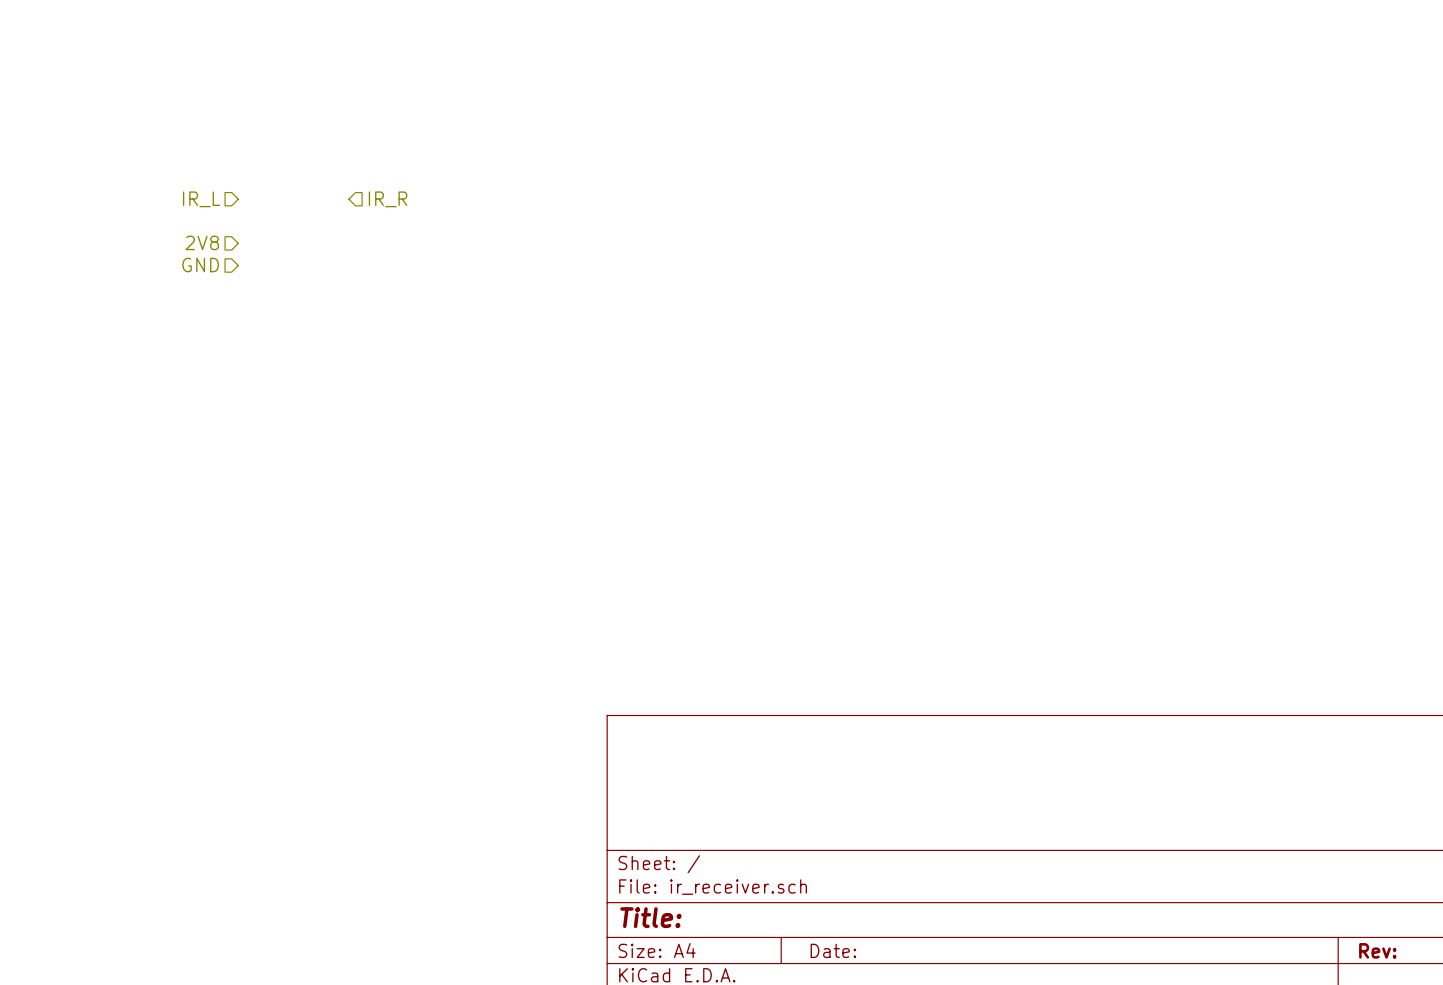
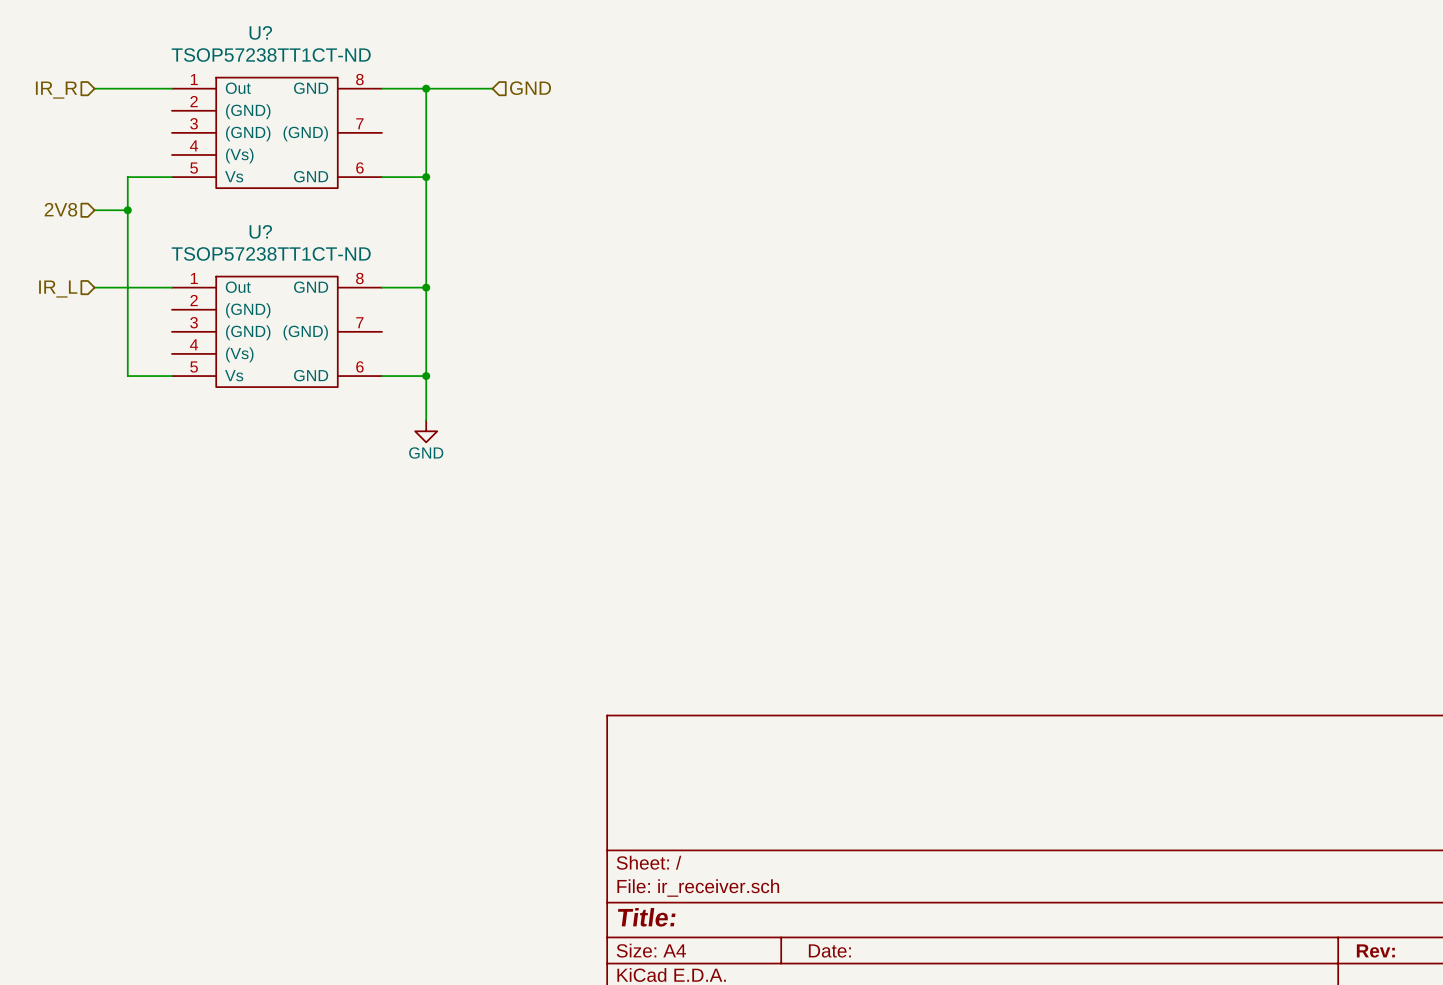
hierarchical label: none -> IR_R (56, 90)
wire: none -> (94, 88) (171, 88)
wire: none -> (381, 88) (492, 88)
wire: none -> (426, 88) (426, 420)
junction: none -> (426, 88)
hierarchical label: none -> GND (530, 88)
U?: none -> TSOP57238TT1CT-ND (276, 132)
wire: none -> (171, 177) (127, 177) (127, 376) (171, 376)
wire: none -> (381, 177) (426, 177)
junction: none -> (426, 177)
hierarchical label position: IR_L (201, 199) -> IR_L (58, 289)
hierarchical label: IR_R (388, 199) -> none
wire: none -> (94, 210) (127, 210)
junction: none -> (127, 210)
hierarchical label position: 2V8 (202, 242) -> 2V8 (60, 209)
hierarchical label: GND (200, 265) -> none
wire: none -> (94, 287) (171, 287)
wire: none -> (381, 287) (426, 287)
junction: none -> (426, 287)
U?: none -> TSOP57238TT1CT-ND (276, 331)
wire: none -> (381, 376) (426, 376)
junction: none -> (426, 376)
power symbol: none -> GND (426, 431)

